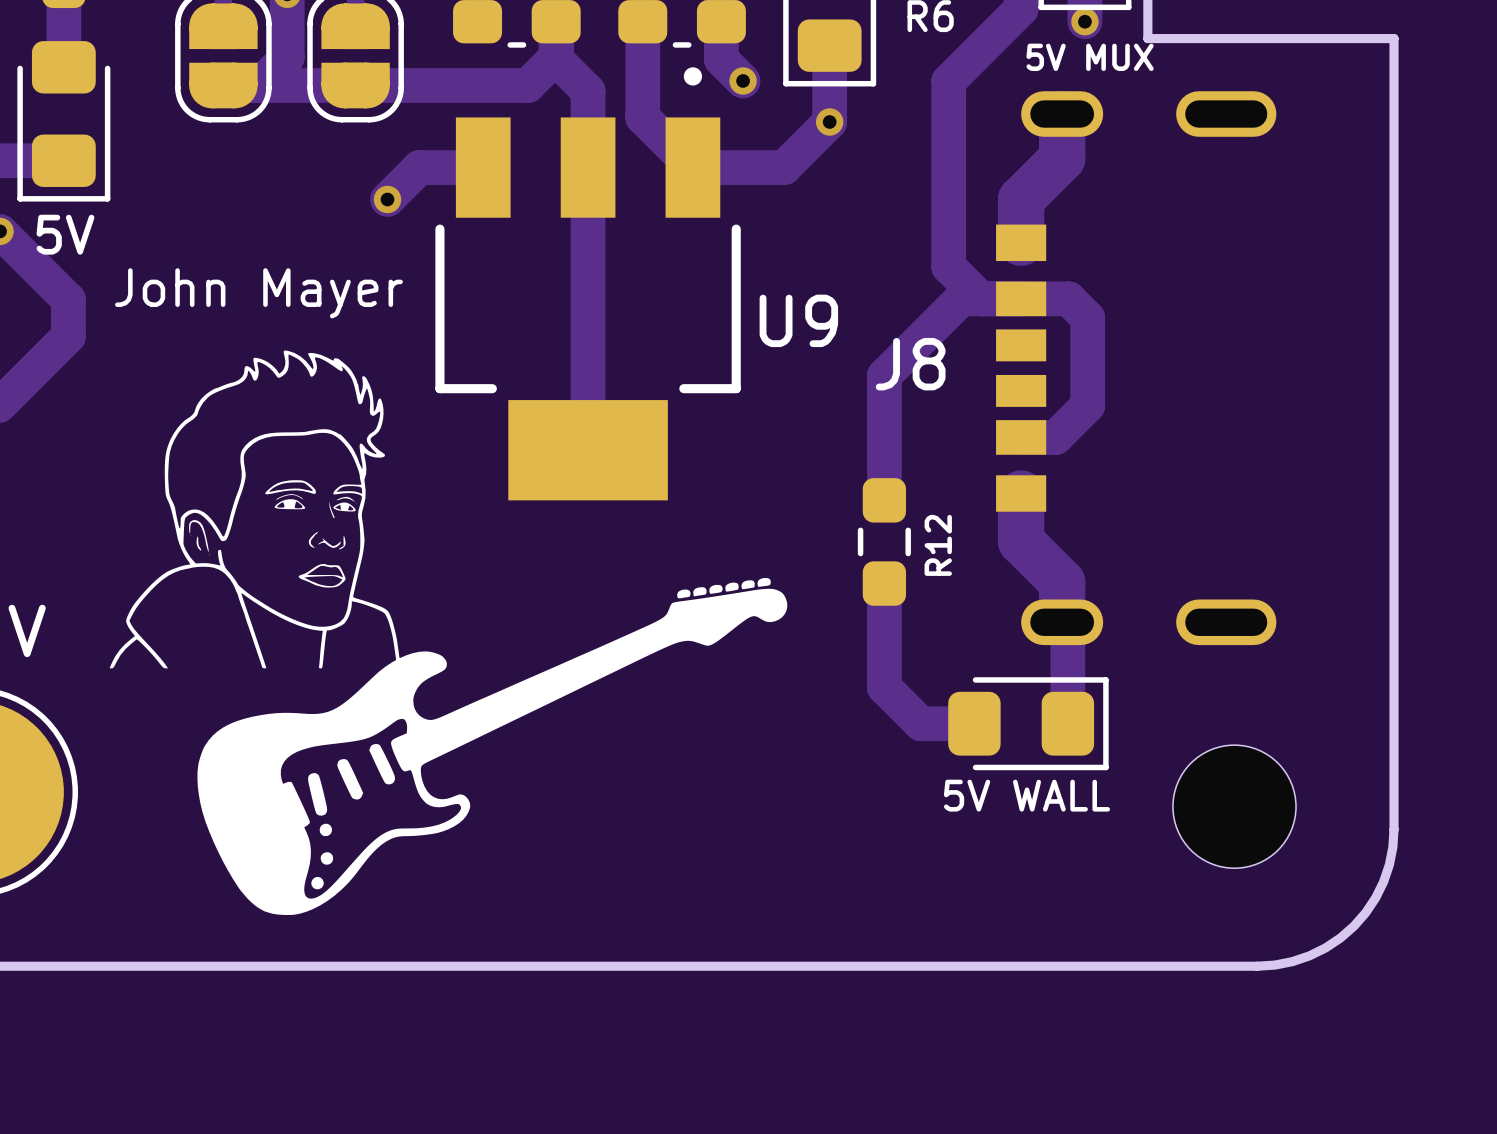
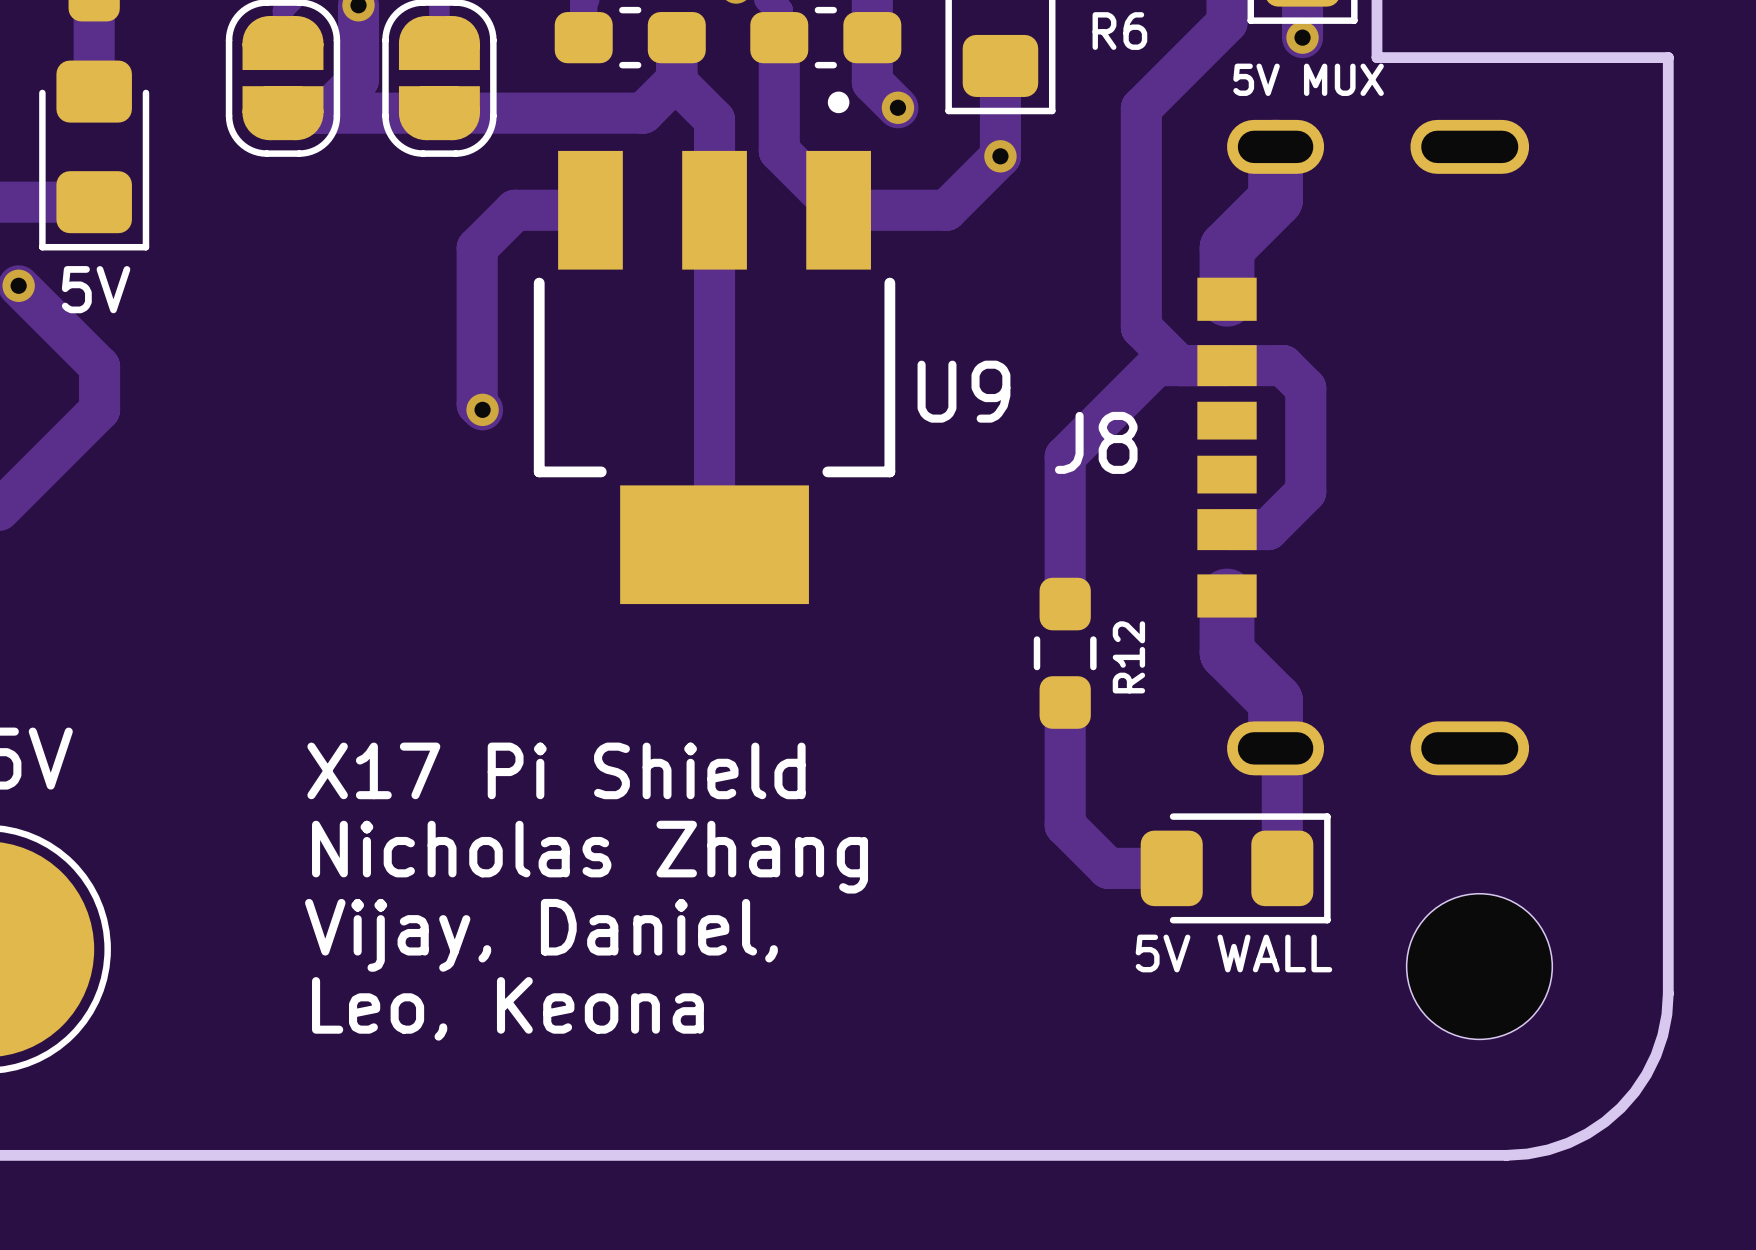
track: none -> (477, 248) (477, 404) (482, 409)
via position: (387, 199) -> (482, 409)
text: John Mayer (258, 293) -> none
drawing: [109, 350, 788, 915] -> none
text: none -> X17 Pi Shield (556, 770)
text: none -> Nicholas Zhang (590, 857)
text: none -> Vijay, Daniel, (541, 935)
text: none -> Leo, Keona (507, 1008)

